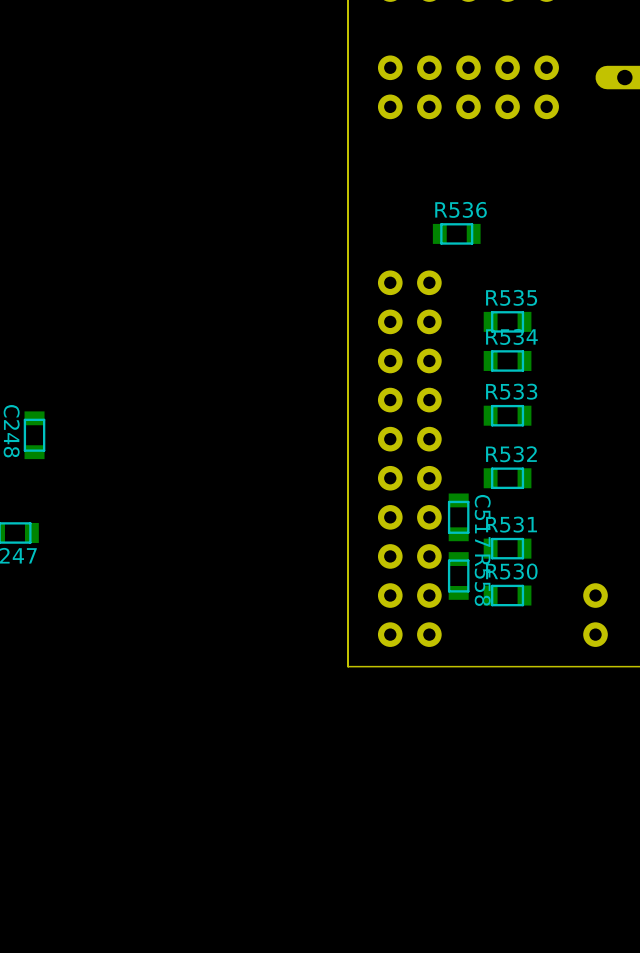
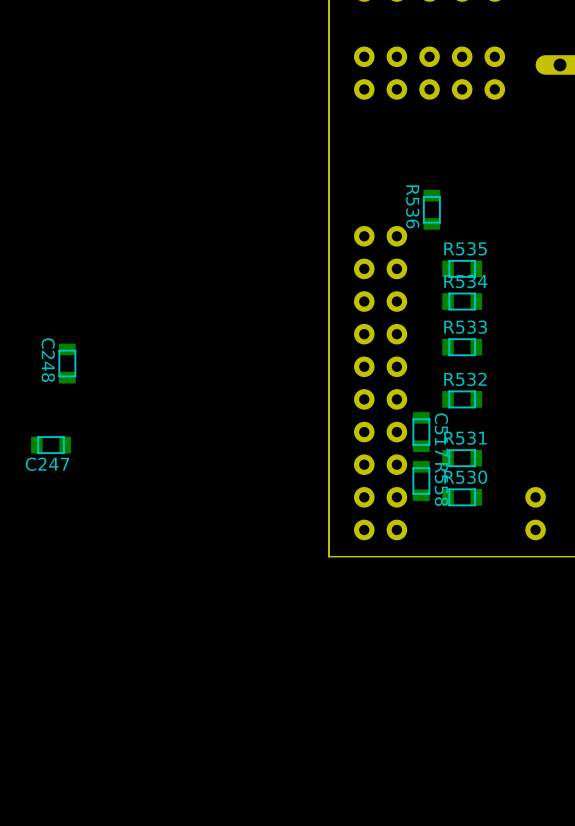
R536 name position: R536 (461, 209) -> R536 (412, 206)
R536 rotation: 0° (456, 233) -> 90° clockwise (431, 209)

